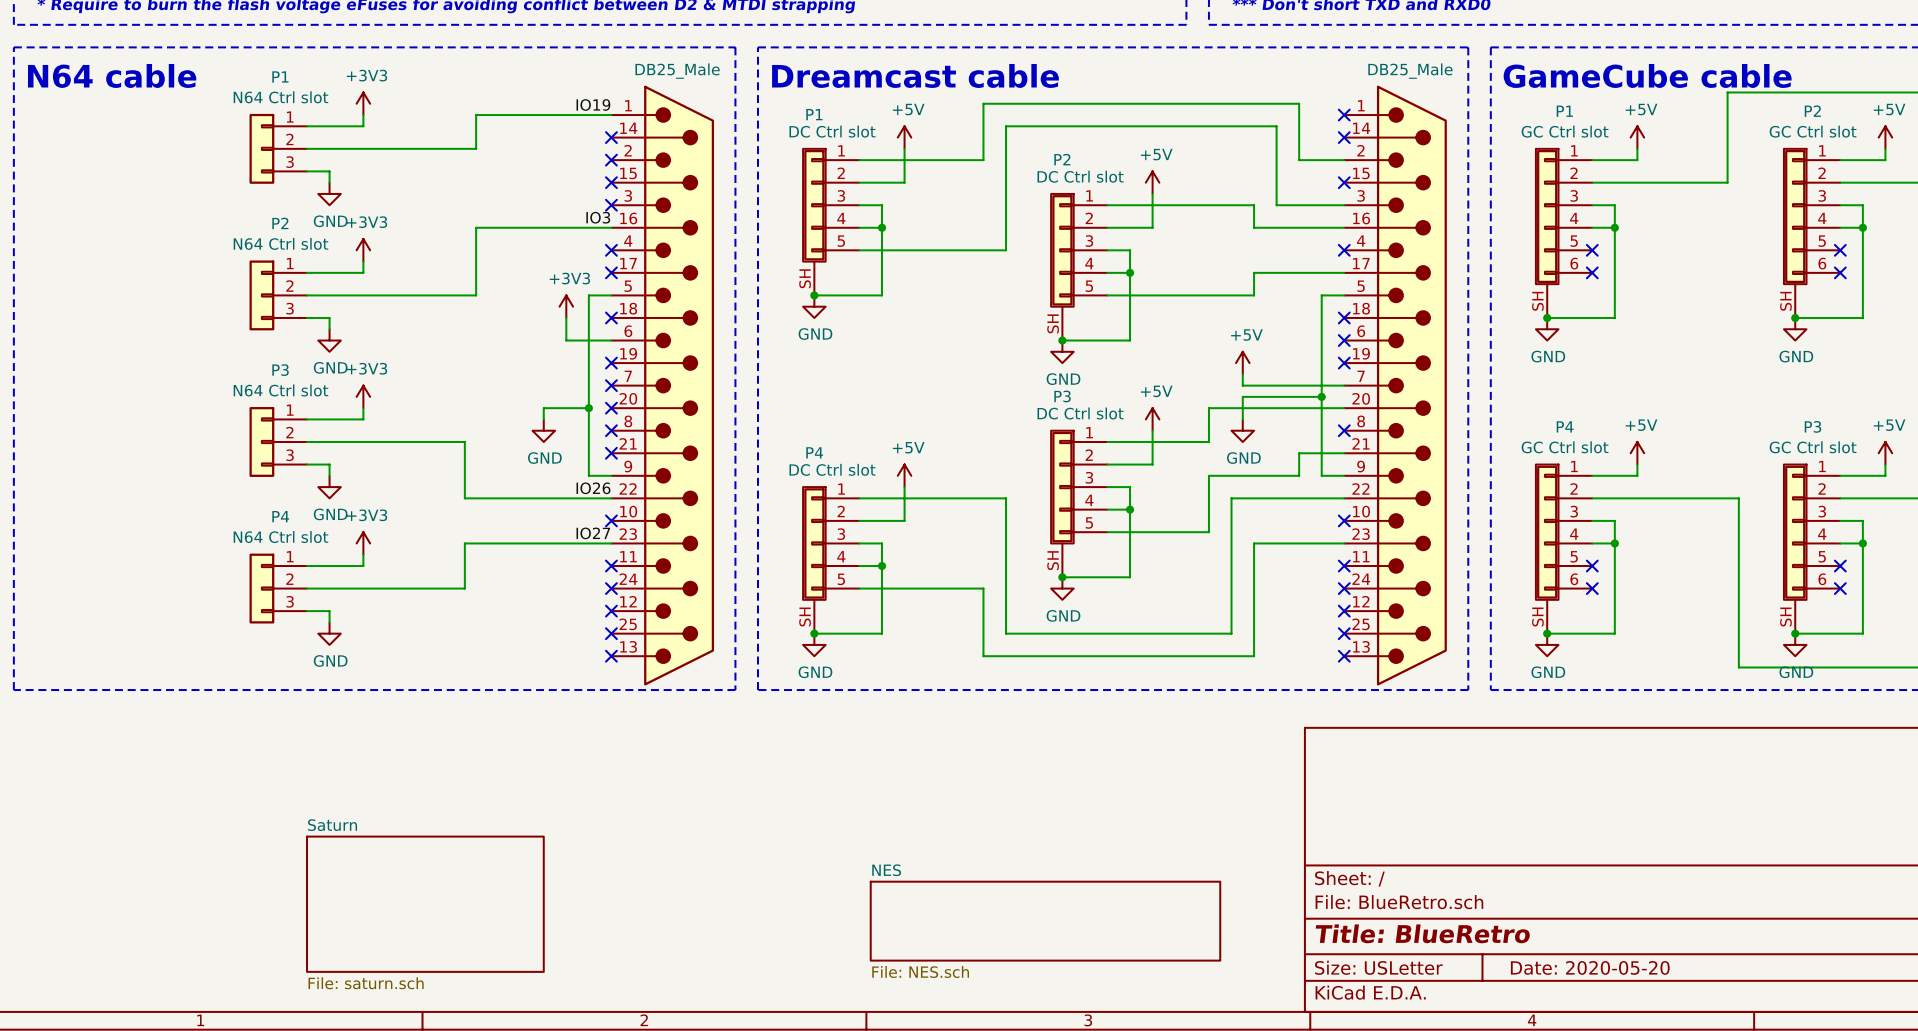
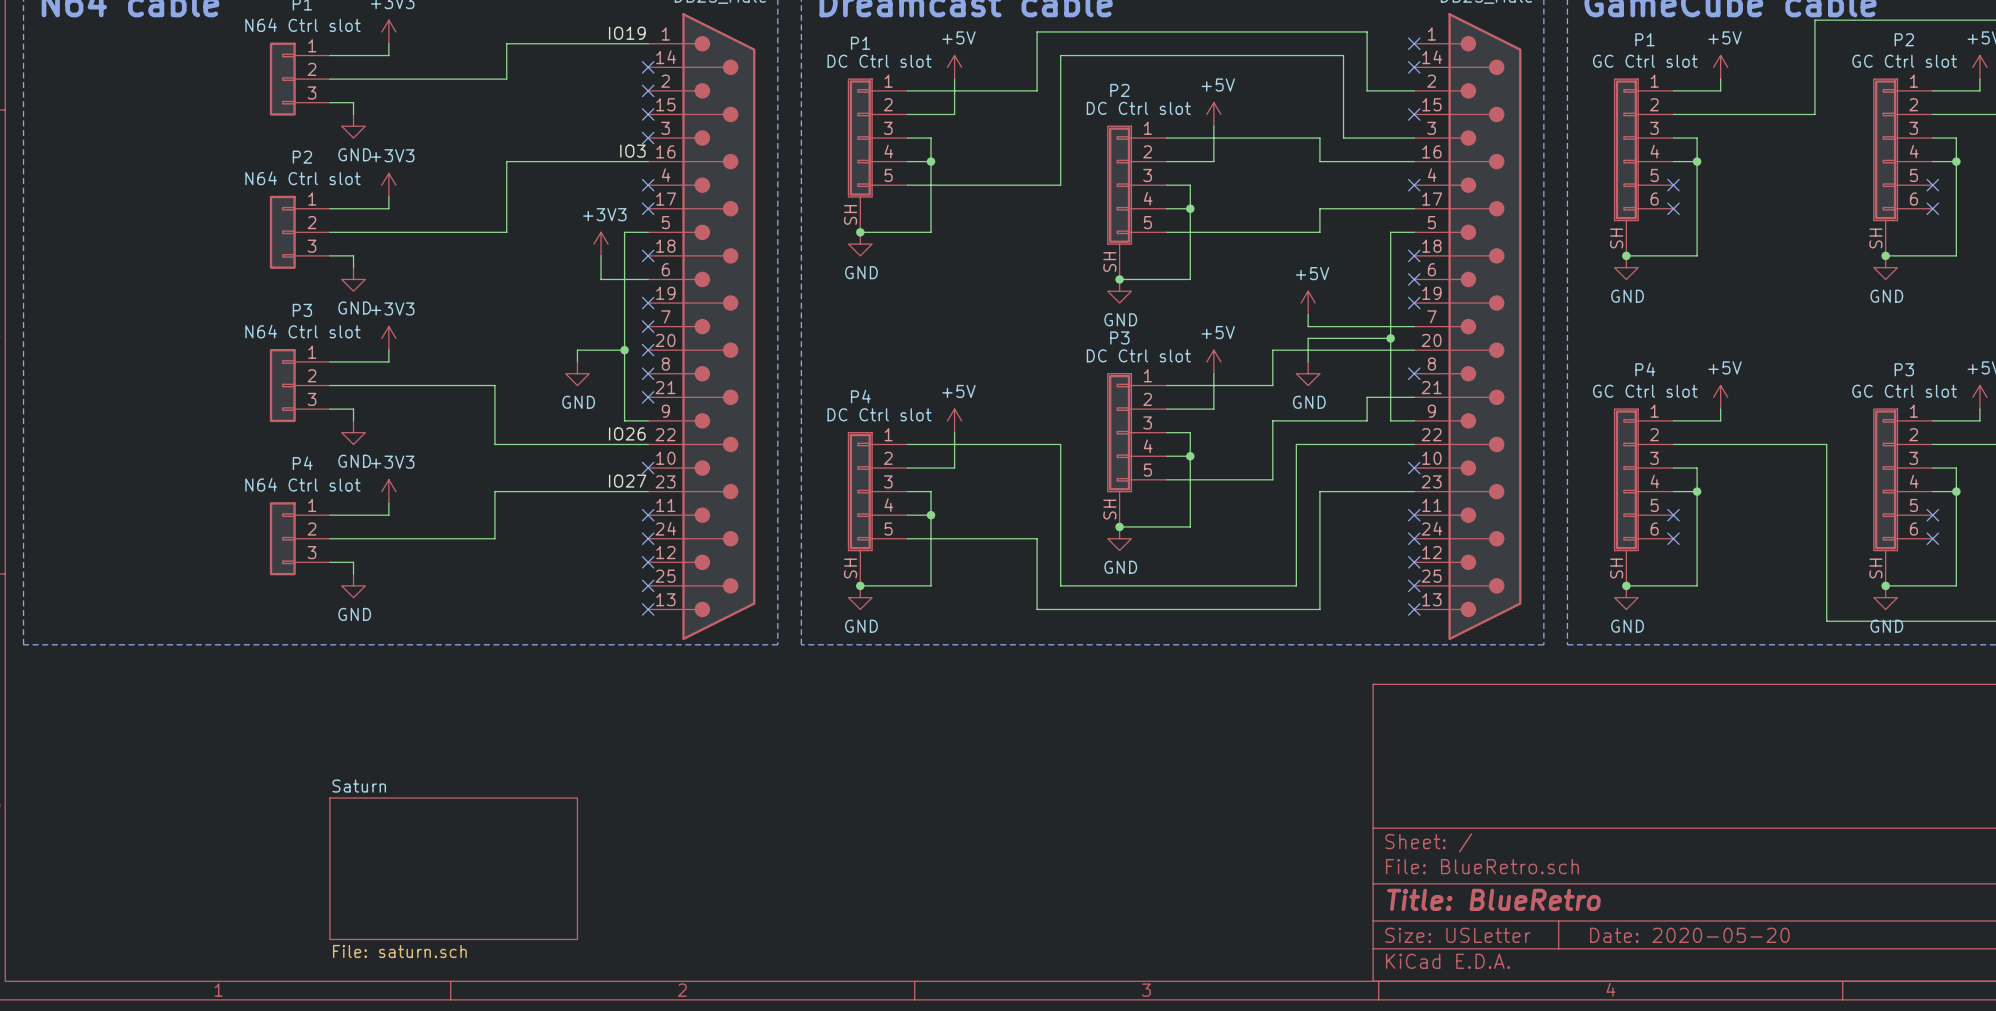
sheet NES: File: NES.sch (1045, 921) -> none

